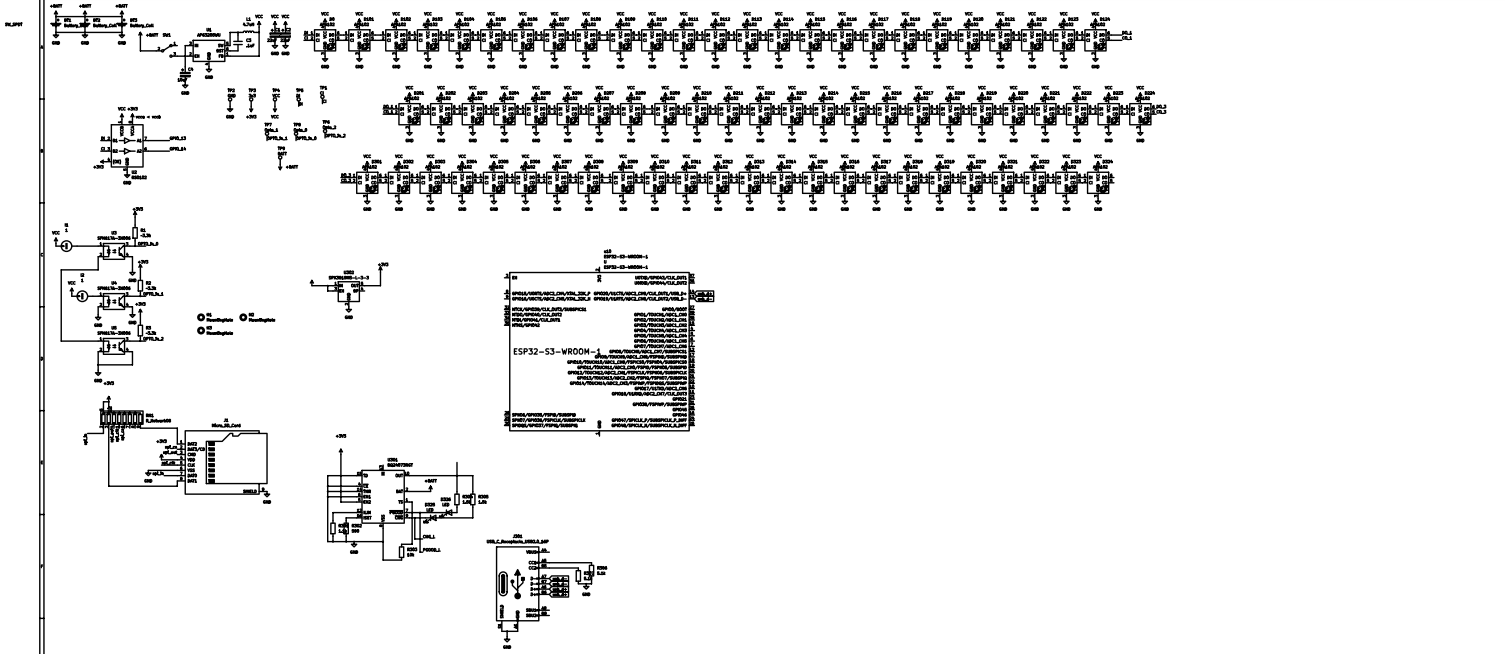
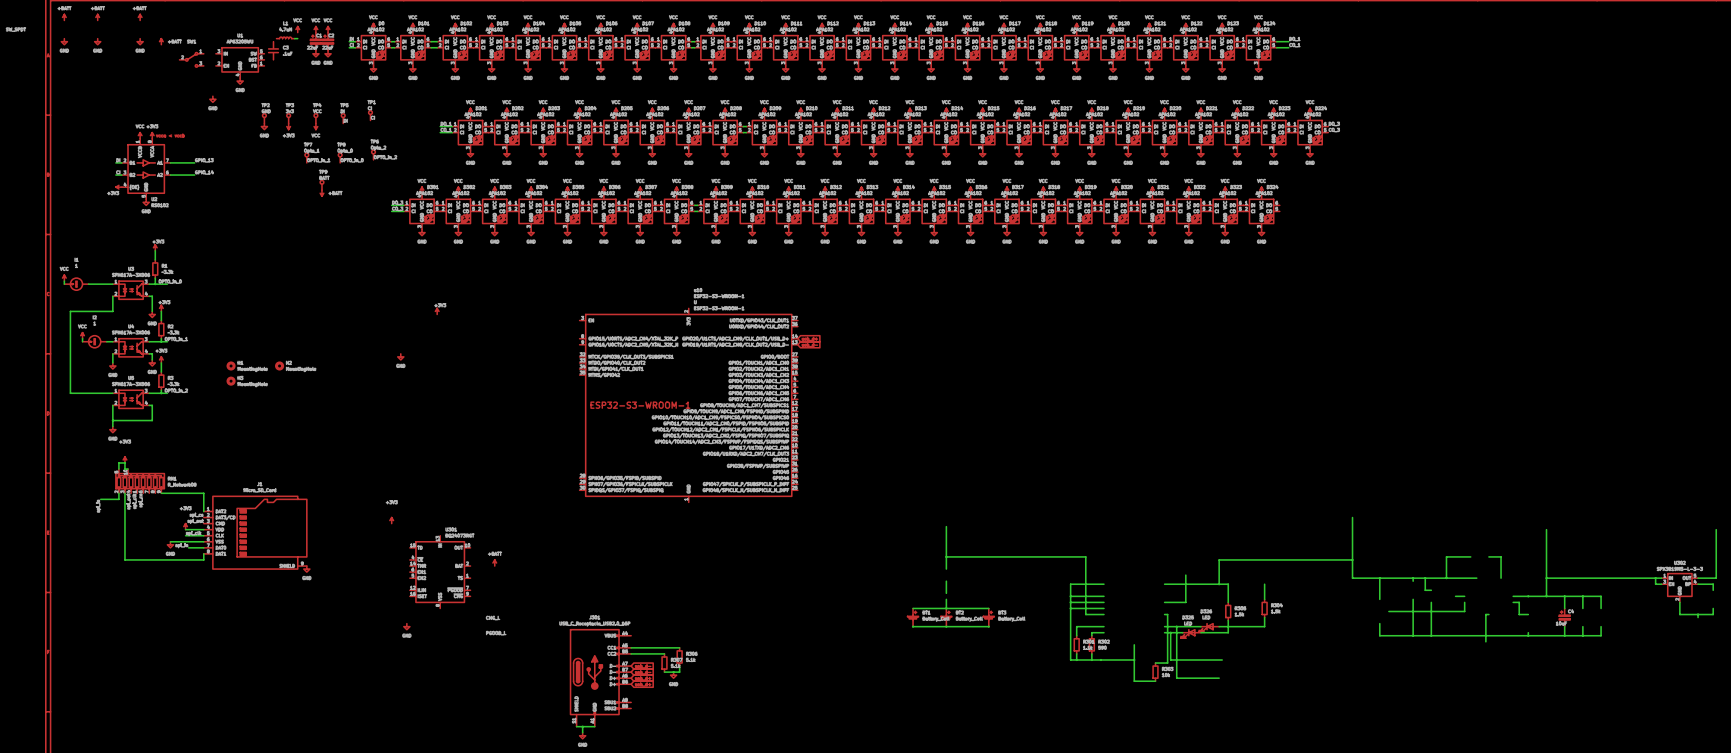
wire: (55, 16) (121, 16) -> none
part position: (55, 24) -> (913, 617)
part position: (84, 24) -> (946, 617)
part position: (121, 24) -> (988, 617)
wire: (259, 27) (259, 56) (230, 56) -> none
wire: (55, 32) (121, 32) -> none
wire: (238, 32) (238, 35) -> none
wire: (240, 32) (230, 32) (230, 45) -> none
wire: (140, 37) (140, 50) (156, 50) -> none
wire: (187, 45) (185, 45) (185, 66) -> none
wire: (230, 50) (238, 50) -> none
wire: (177, 56) (187, 56) -> none
part position: (185, 74) -> (1564, 617)
wire: (380, 272) (380, 285) (364, 285) -> none
power symbol: (311, 283) -> none
wire: (311, 285) (332, 285) -> none
wire: (327, 285) (327, 290) (332, 290) -> none
part position: (348, 294) -> (1679, 587)
wire: none -> (1352, 517) (1352, 578) (1476, 578)
wire: (340, 454) (340, 502) (356, 502) -> none
wire: none -> (946, 526) (946, 569)
wire: none -> (1546, 529) (1546, 596)
wire: none -> (1716, 529) (1716, 578) (1698, 578)
wire: (456, 462) (456, 491) -> none
wire: (356, 475) (327, 475) (327, 541) (383, 541) -> none
wire: (409, 475) (472, 475) (472, 491) -> none
wire: none -> (946, 556) (1085, 556) (1085, 614) (1103, 614)
wire: none -> (1470, 556) (1446, 556) (1446, 578)
wire: none -> (1488, 556) (1501, 556) (1501, 578)
wire: (327, 486) (356, 486) -> none
wire: none -> (1352, 559) (1219, 559) (1219, 584)
wire: (327, 491) (356, 491) -> none
wire: (409, 491) (430, 491) -> none
wire: (327, 496) (356, 496) -> none
part position: (456, 499) -> (1264, 608)
part position: (472, 499) -> (1228, 611)
wire: none -> (1185, 575) (1185, 602) (1164, 602)
wire: (409, 502) (412, 502) (412, 544) (401, 544) -> none
wire: none -> (1379, 578) (1379, 599)
wire: none -> (1413, 578) (1413, 581)
wire: none -> (1425, 578) (1425, 590) (1431, 590)
wire: none -> (1546, 578) (1661, 578)
wire: none -> (1655, 578) (1655, 584) (1661, 584)
wire: none -> (946, 581) (946, 593)
wire: (456, 507) (456, 512) -> none
wire: (472, 507) (472, 517) (441, 517) -> none
wire: none -> (1103, 584) (1070, 584) (1070, 659) (1134, 659)
wire: none -> (1164, 584) (1228, 584) (1228, 602)
wire: none -> (1264, 584) (1264, 599)
wire: none -> (1698, 584) (1713, 584) (1713, 590)
wire: (356, 512) (332, 512) (332, 520) -> none
wire: (409, 512) (441, 512) -> none
wire: (420, 512) (420, 552) (422, 552) -> none
part position: (448, 513) -> (1209, 627)
wire: (356, 517) (346, 517) (346, 520) -> none
wire: (409, 517) (425, 517) -> none
wire: (414, 517) (414, 538) (422, 538) -> none
wire: none -> (1070, 596) (1103, 596)
wire: none -> (1455, 596) (1464, 596)
wire: none -> (1513, 596) (1601, 596) (1601, 608)
wire: none -> (1564, 596) (1564, 608)
wire: none -> (1582, 596) (1582, 608)
part position: (432, 518) -> (1190, 633)
wire: none -> (946, 599) (946, 608)
wire: none -> (1413, 599) (1413, 635)
wire: none -> (1070, 602) (1103, 602)
wire: none -> (1431, 602) (1431, 635)
wire: none -> (1464, 602) (1464, 611) (1388, 611)
wire: none -> (1513, 602) (1519, 602) (1519, 614) (1528, 614)
wire: none -> (1679, 602) (1679, 614) (1713, 614) (1713, 608)
part position: (332, 528) -> (1076, 644)
part position: (346, 528) -> (1091, 644)
wire: (383, 528) (383, 560) (401, 560) -> none
wire: none -> (913, 608) (988, 608)
wire: none -> (1070, 608) (1103, 608)
wire: none -> (1164, 614) (1167, 614) (1167, 663) (1155, 663)
wire: none -> (1488, 614) (1485, 614) (1485, 641)
wire: none -> (1698, 614) (1698, 617)
wire: (332, 536) (332, 541) -> none
wire: (346, 536) (346, 541) -> none
wire: none -> (1264, 617) (1264, 626) (1219, 626)
wire: none -> (1228, 620) (1228, 632) (1200, 632)
wire: none -> (1379, 623) (1379, 635) (1601, 635) (1601, 626)
wire: none -> (913, 626) (988, 626)
junction: none -> (913, 626)
junction: none -> (988, 626)
wire: none -> (1103, 626) (1076, 626) (1076, 635)
wire: none -> (1164, 626) (1200, 626)
wire: none -> (1176, 626) (1176, 678) (1219, 678)
wire: none -> (1564, 626) (1564, 635)
wire: none -> (1582, 626) (1582, 635)
wire: none -> (1103, 632) (1091, 632) (1091, 635)
wire: none -> (1164, 632) (1182, 632)
wire: none -> (1170, 632) (1170, 659) (1222, 659)
wire: none -> (1528, 632) (1528, 635)
part position: (401, 552) -> (1155, 672)
wire: none -> (1134, 644) (1134, 681) (1155, 681)
wire: none -> (1076, 653) (1076, 659)
wire: none -> (1091, 653) (1091, 659)

